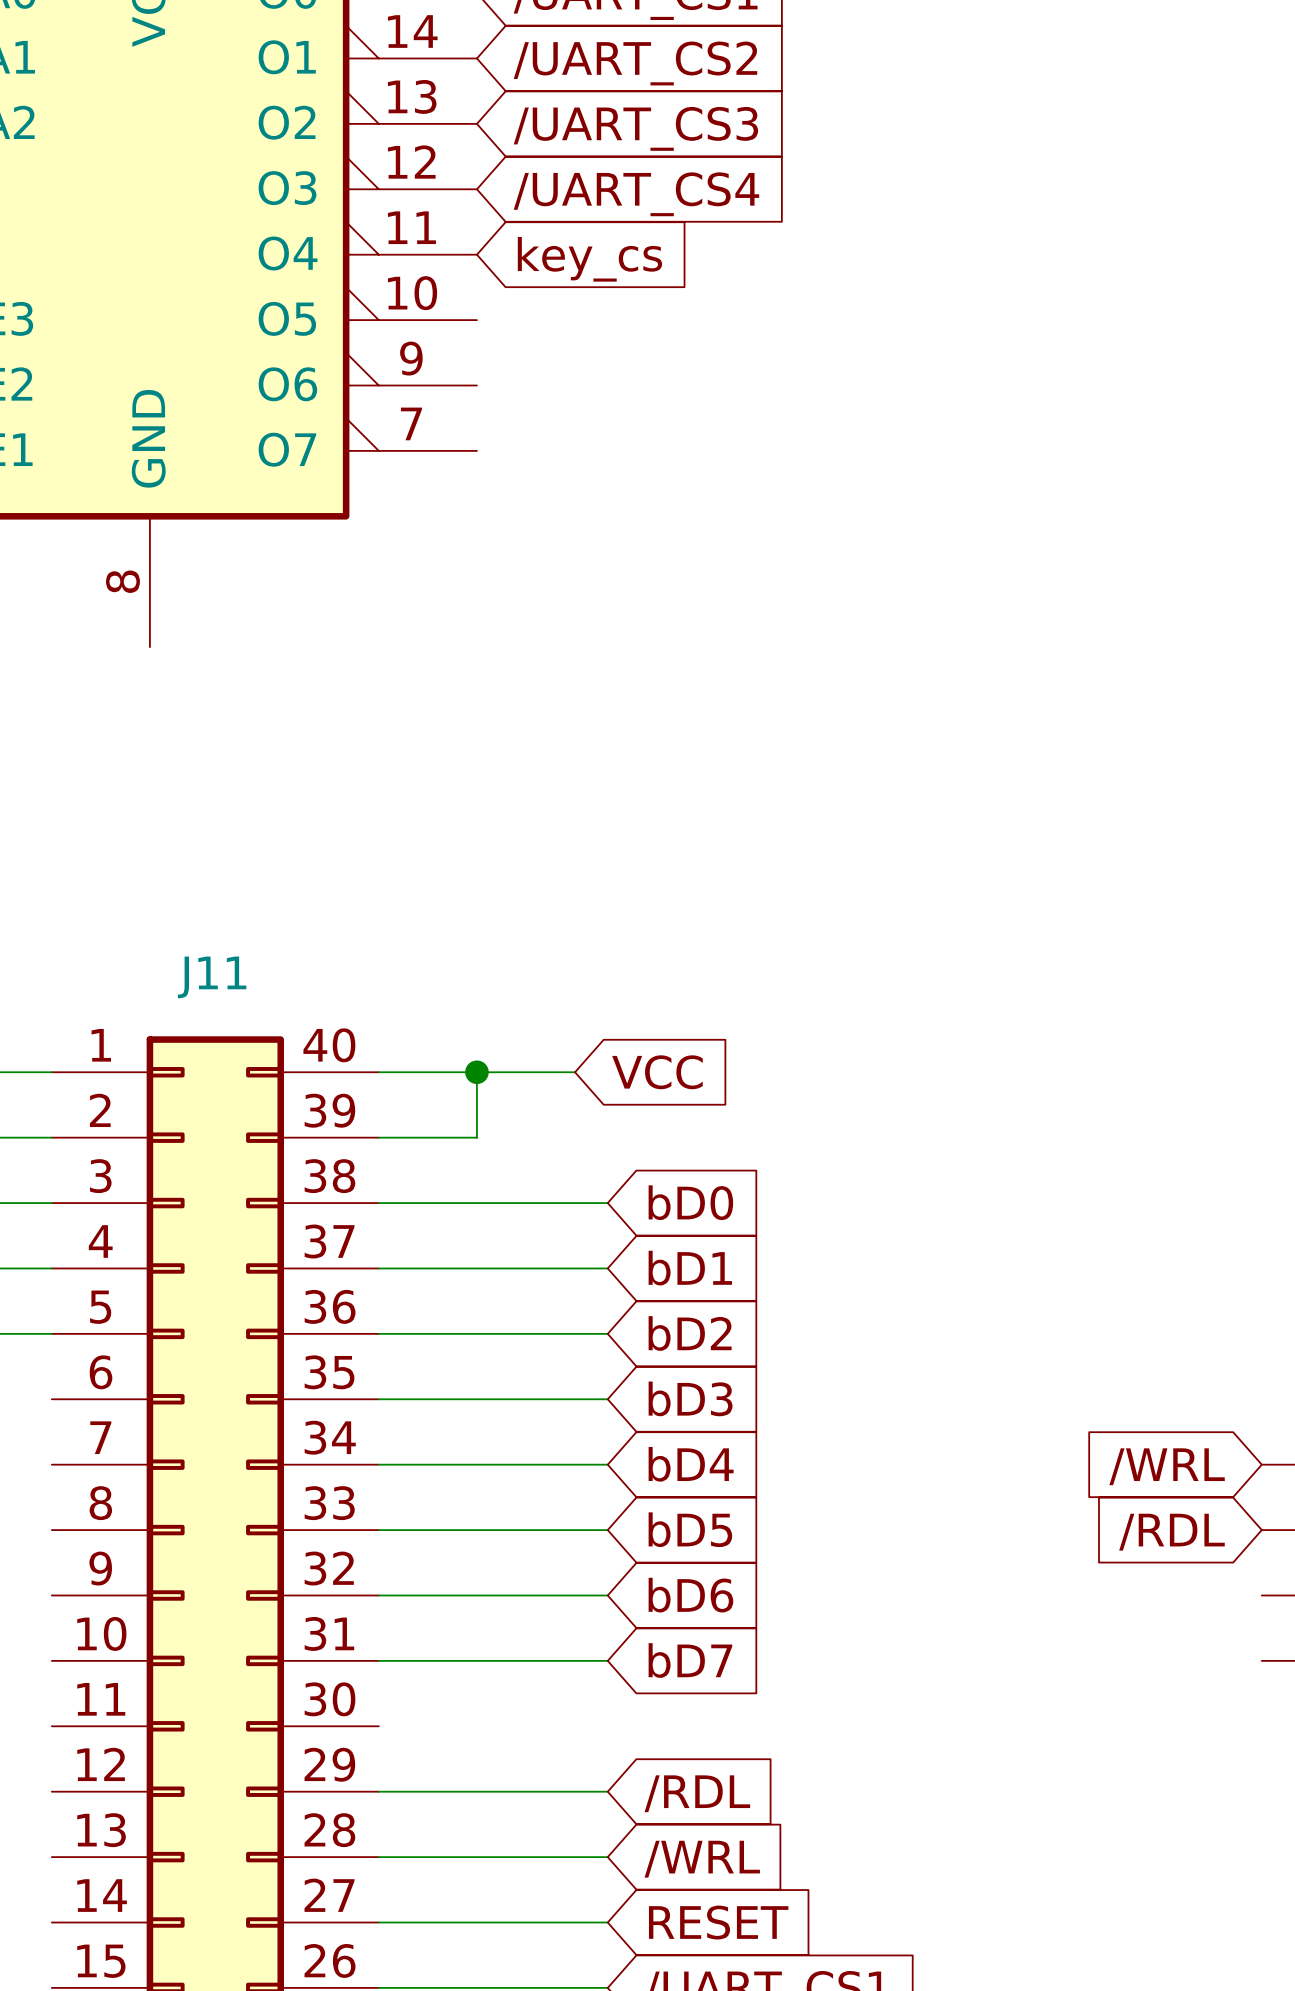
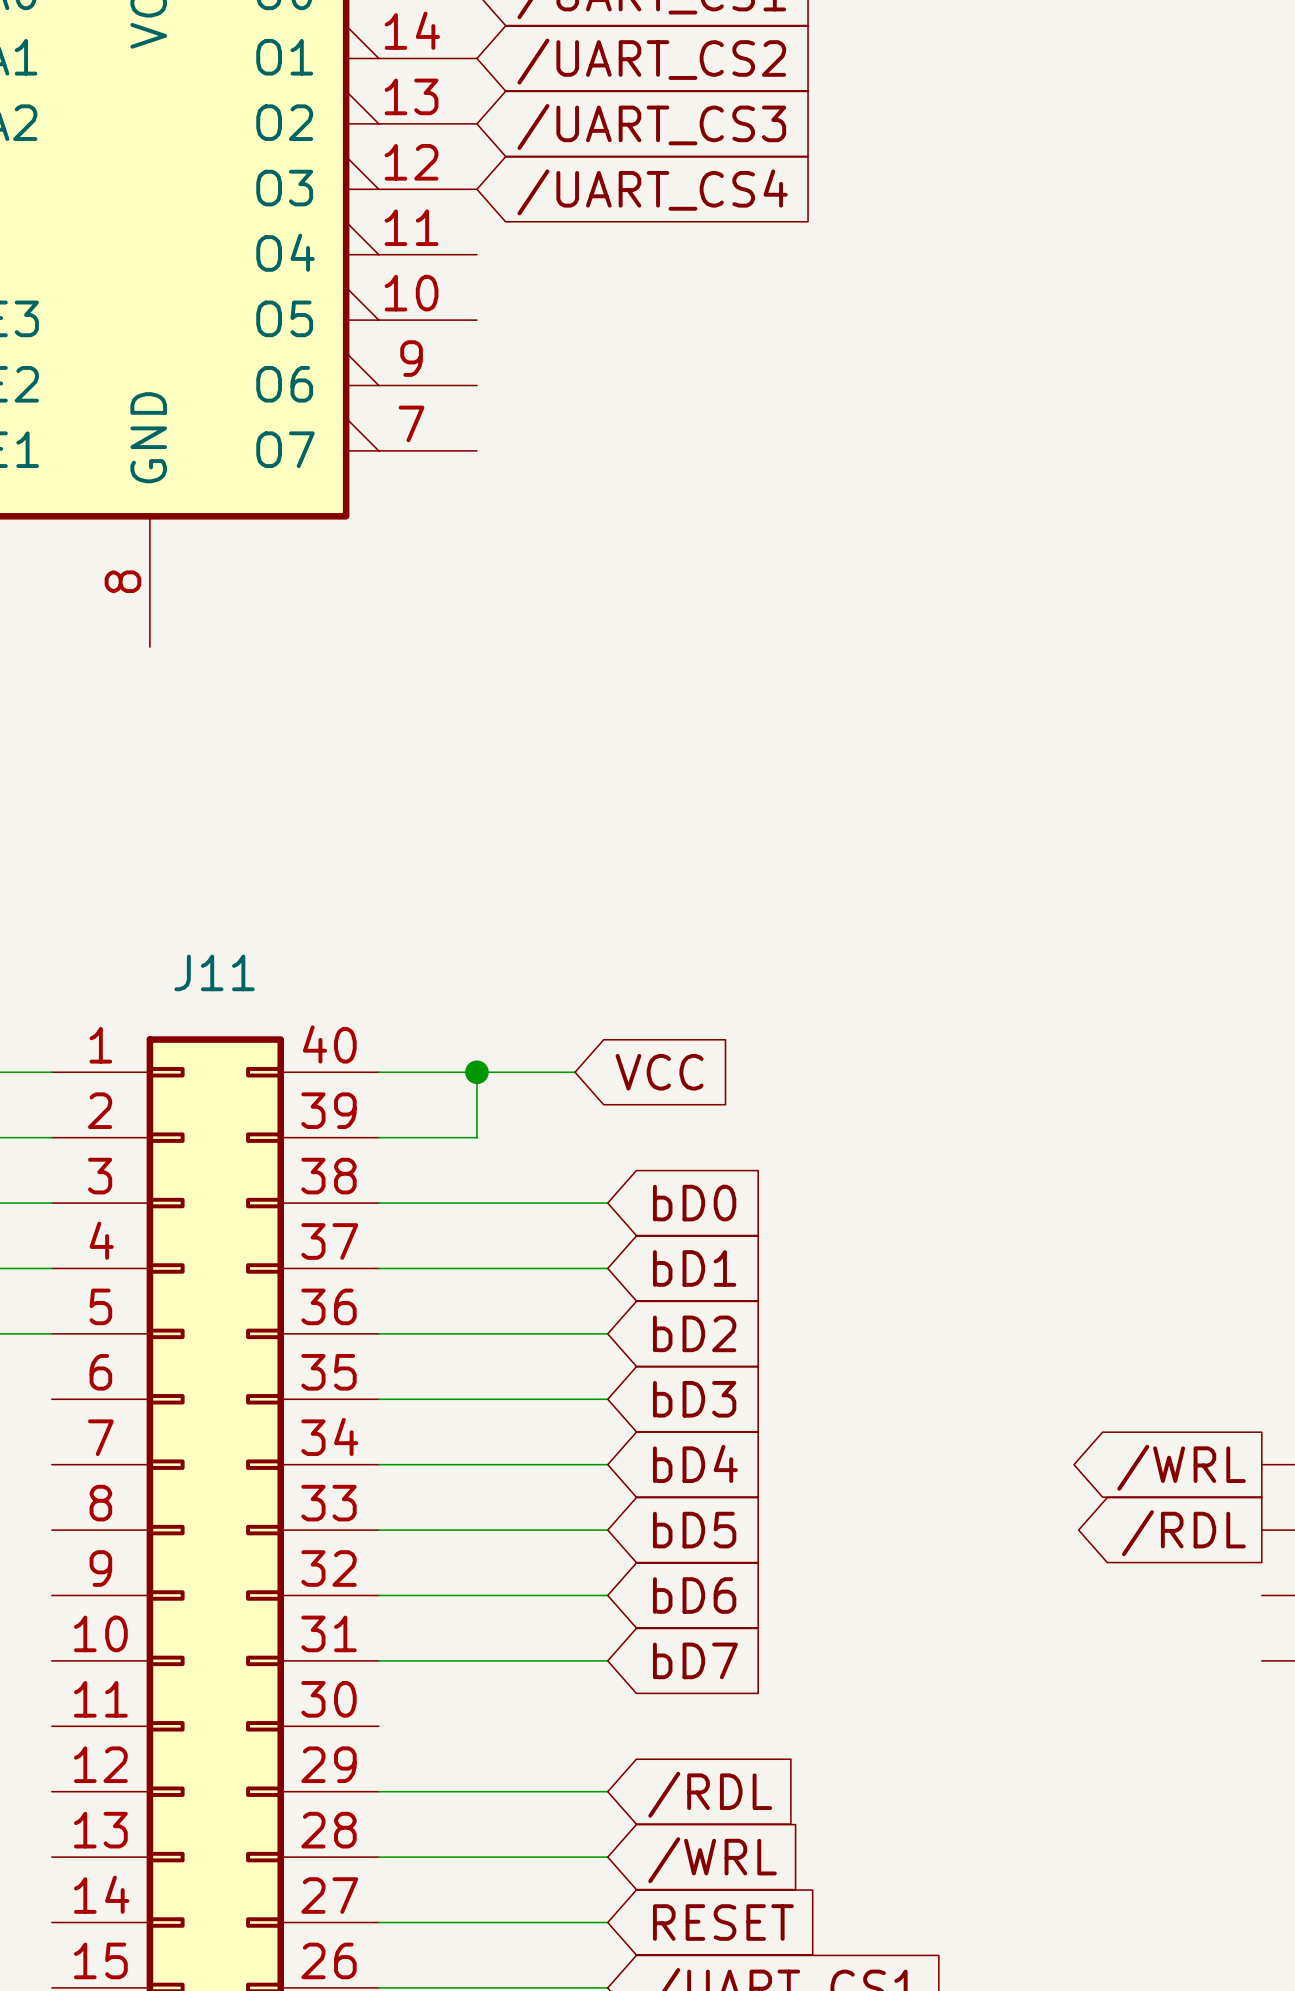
global label: key_cs (589, 259) -> none
global label shape: input (1167, 1466) -> output (1181, 1467)
global label shape: input (1171, 1532) -> output (1183, 1533)

